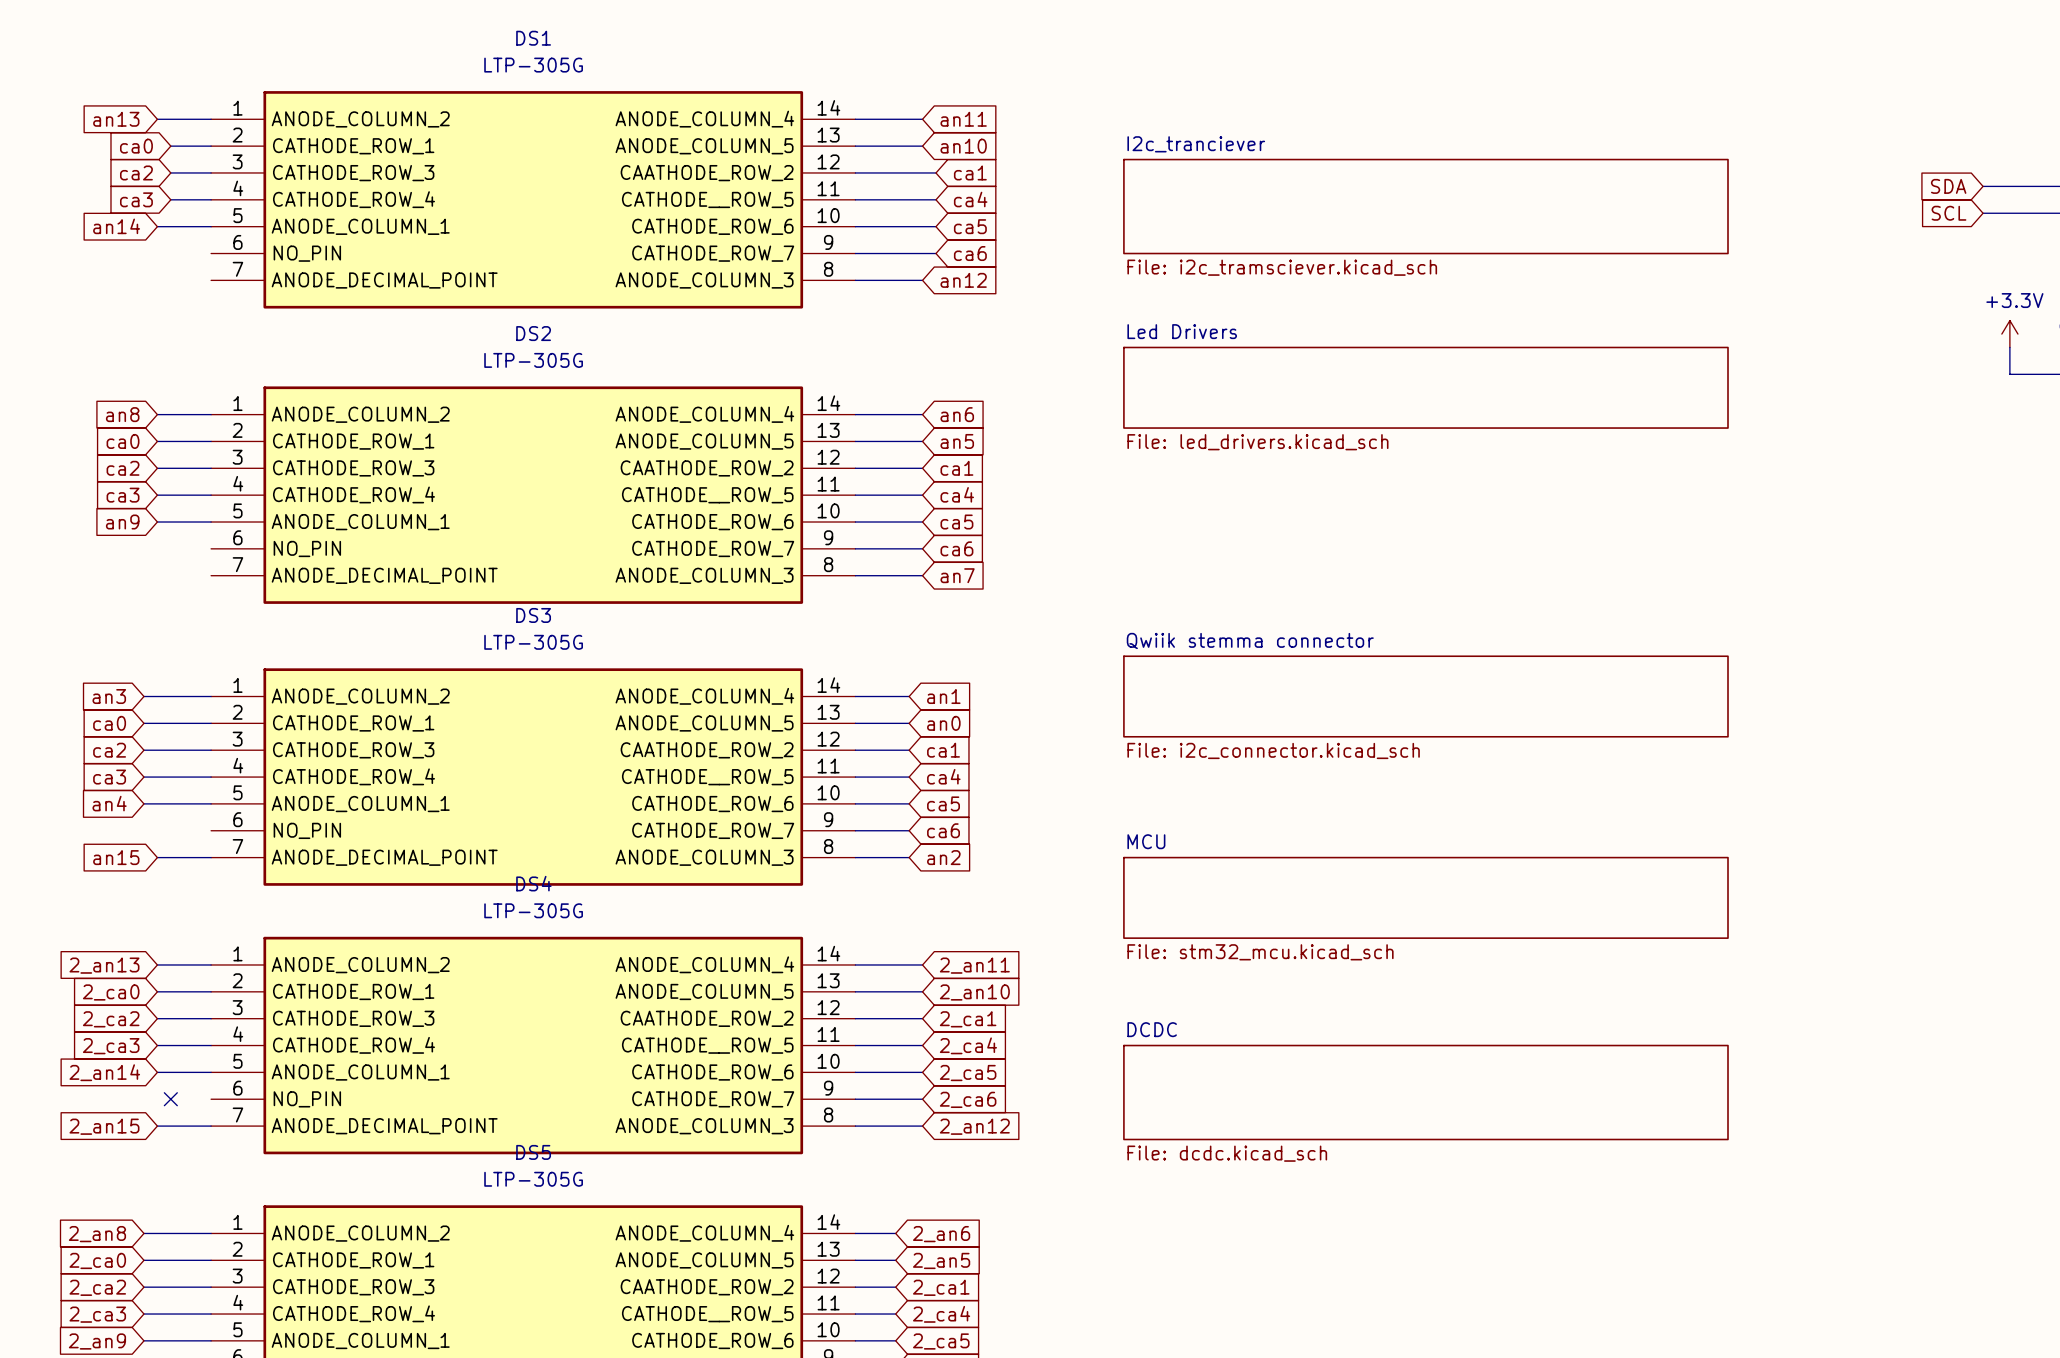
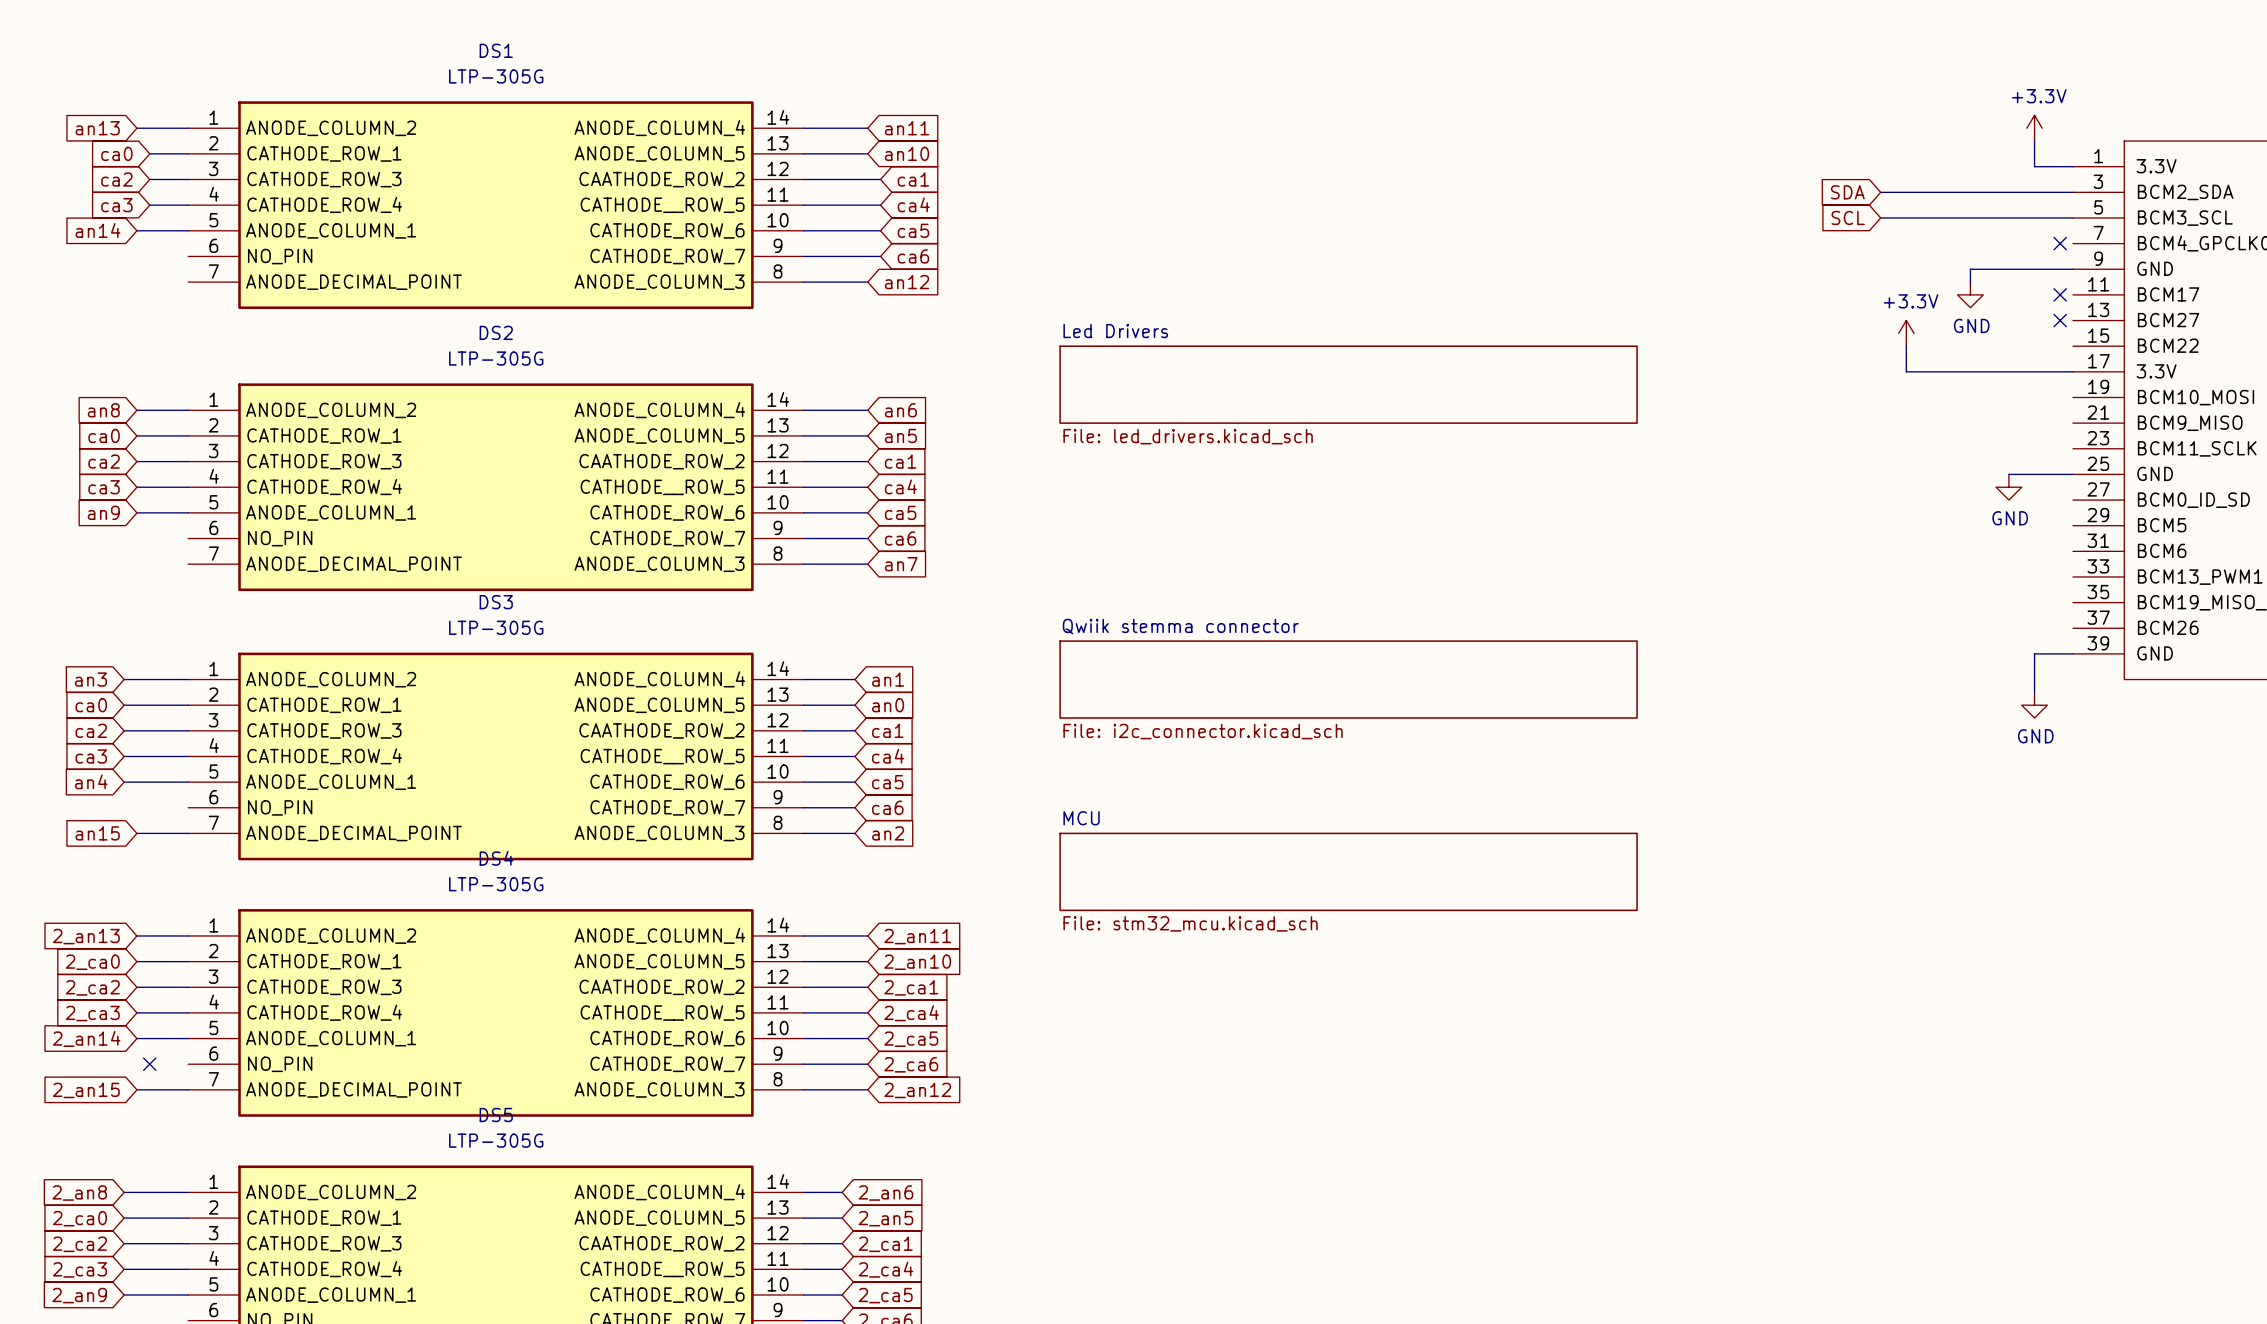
sheet I2c_tranciever: File: i2c_tramsciever.kicad_sch (1425, 206) -> none
sheet DCDC: File: dcdc.kicad_sch (1425, 1092) -> none

